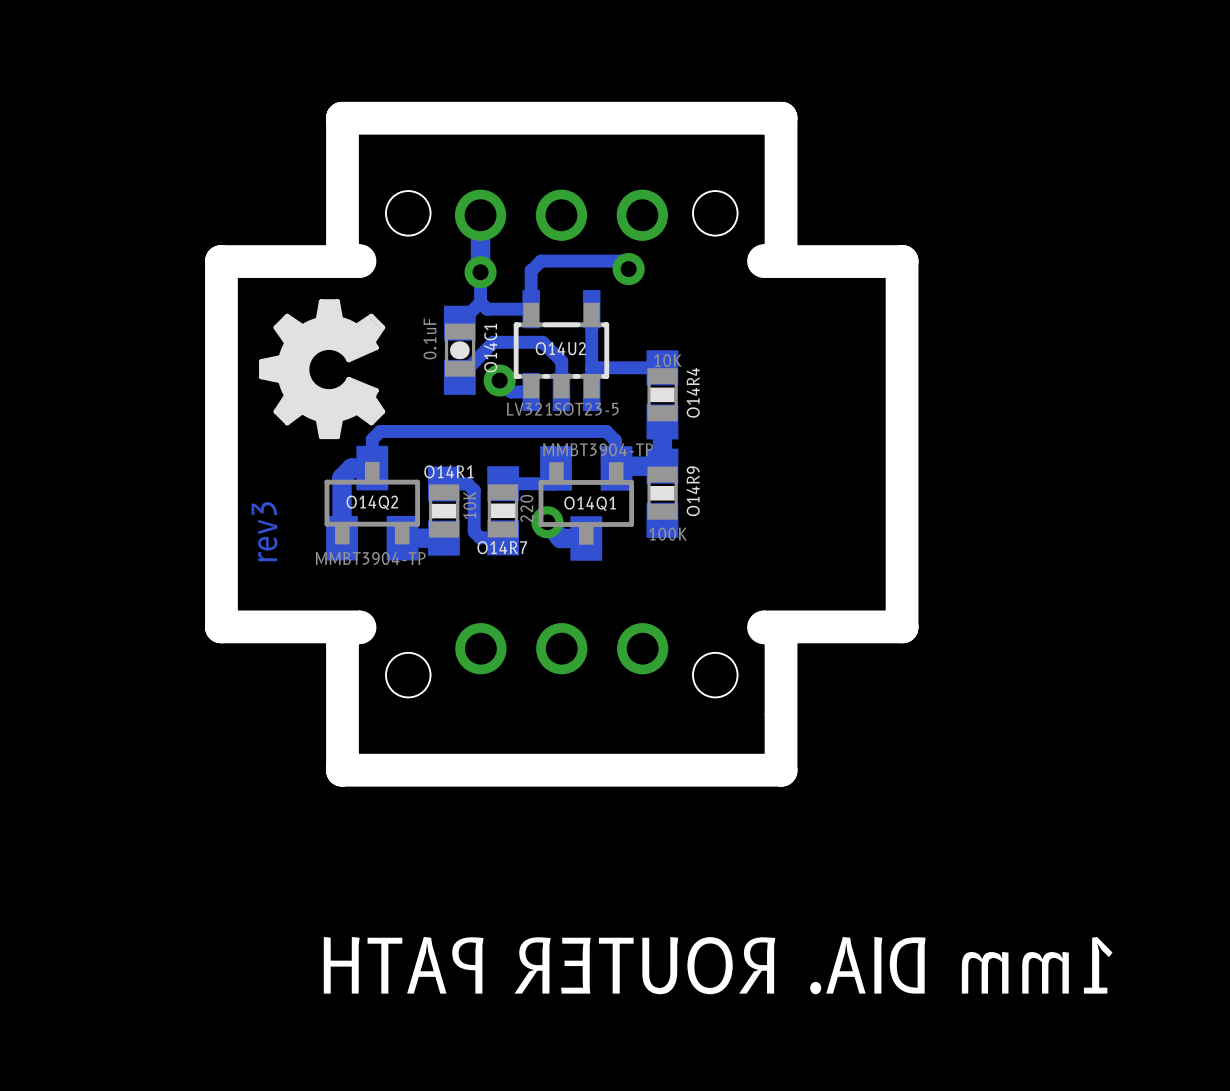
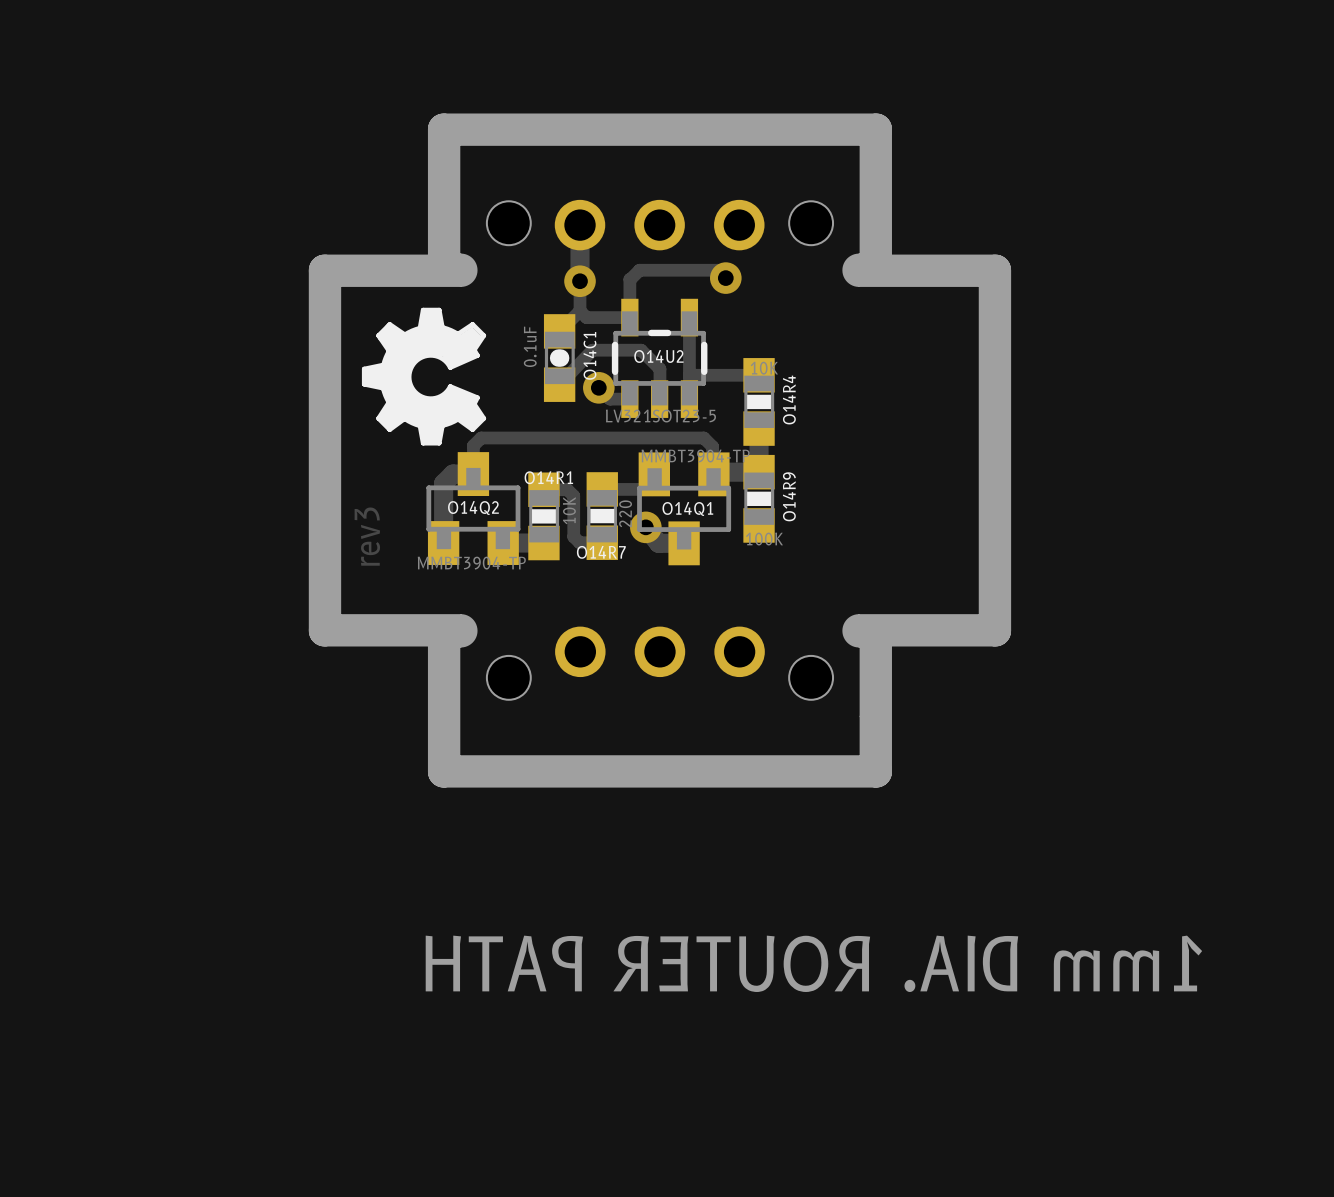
O14U2 footprint: [513, 290, 610, 412] -> [611, 298, 708, 418]

